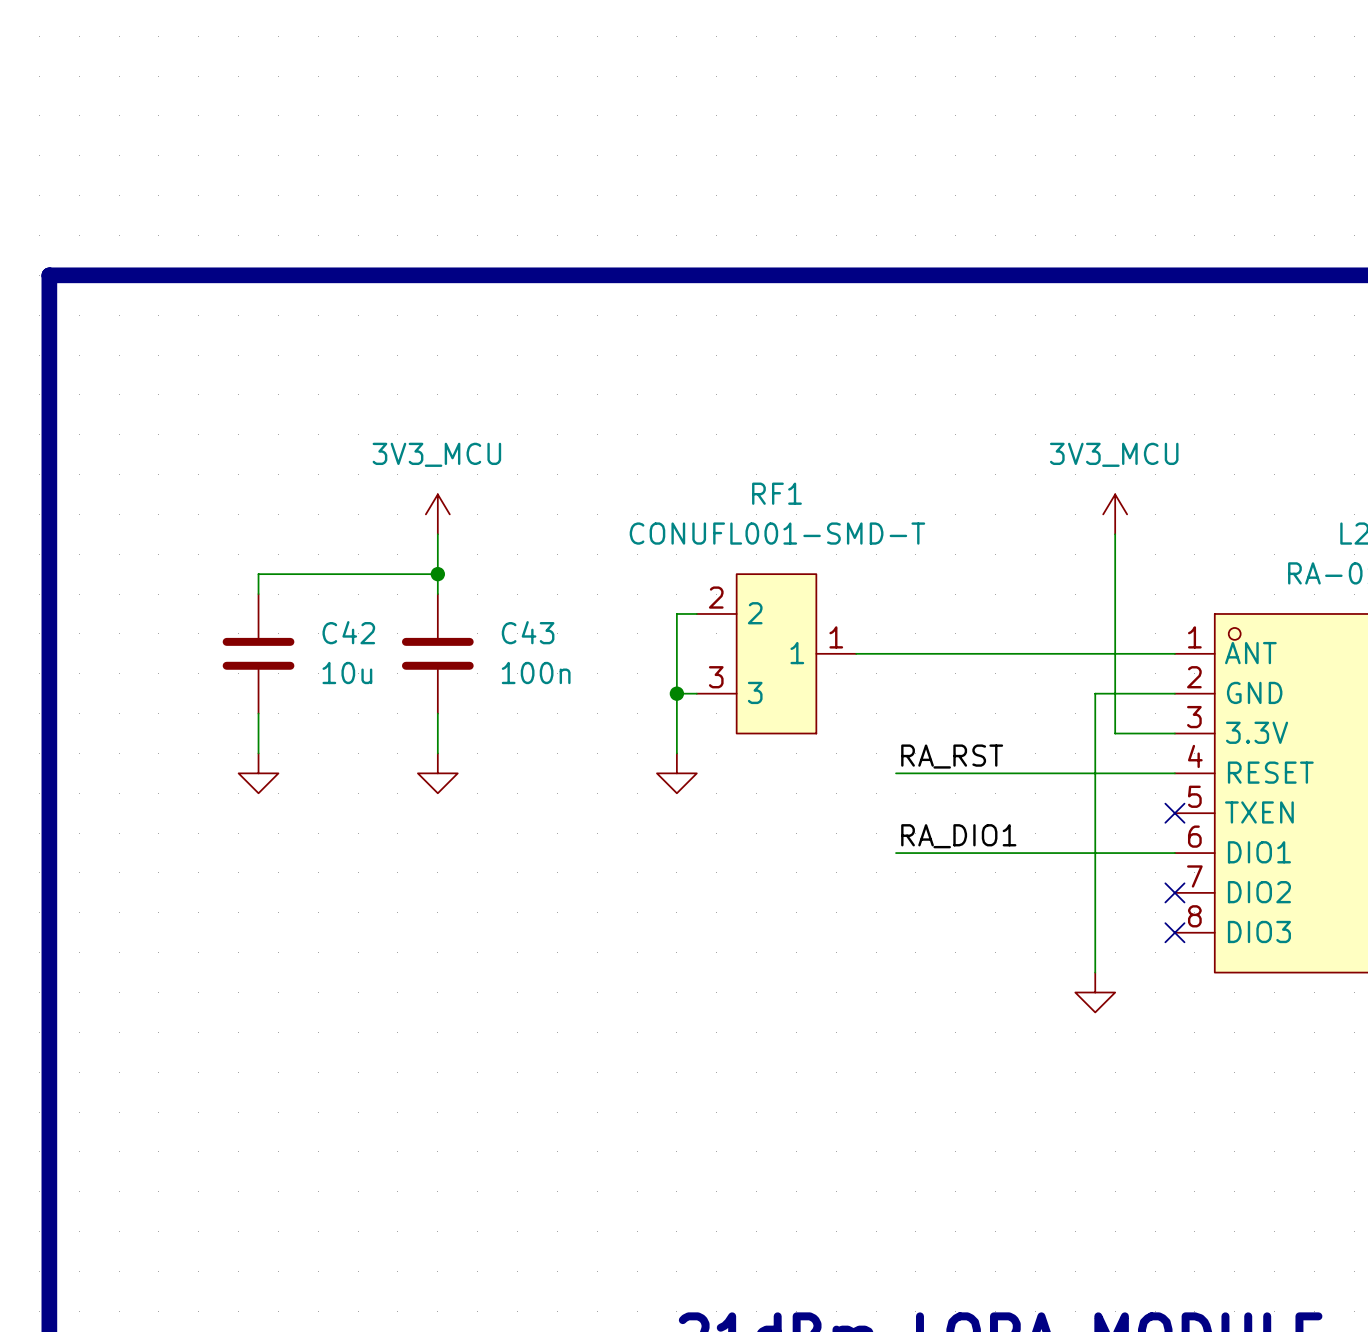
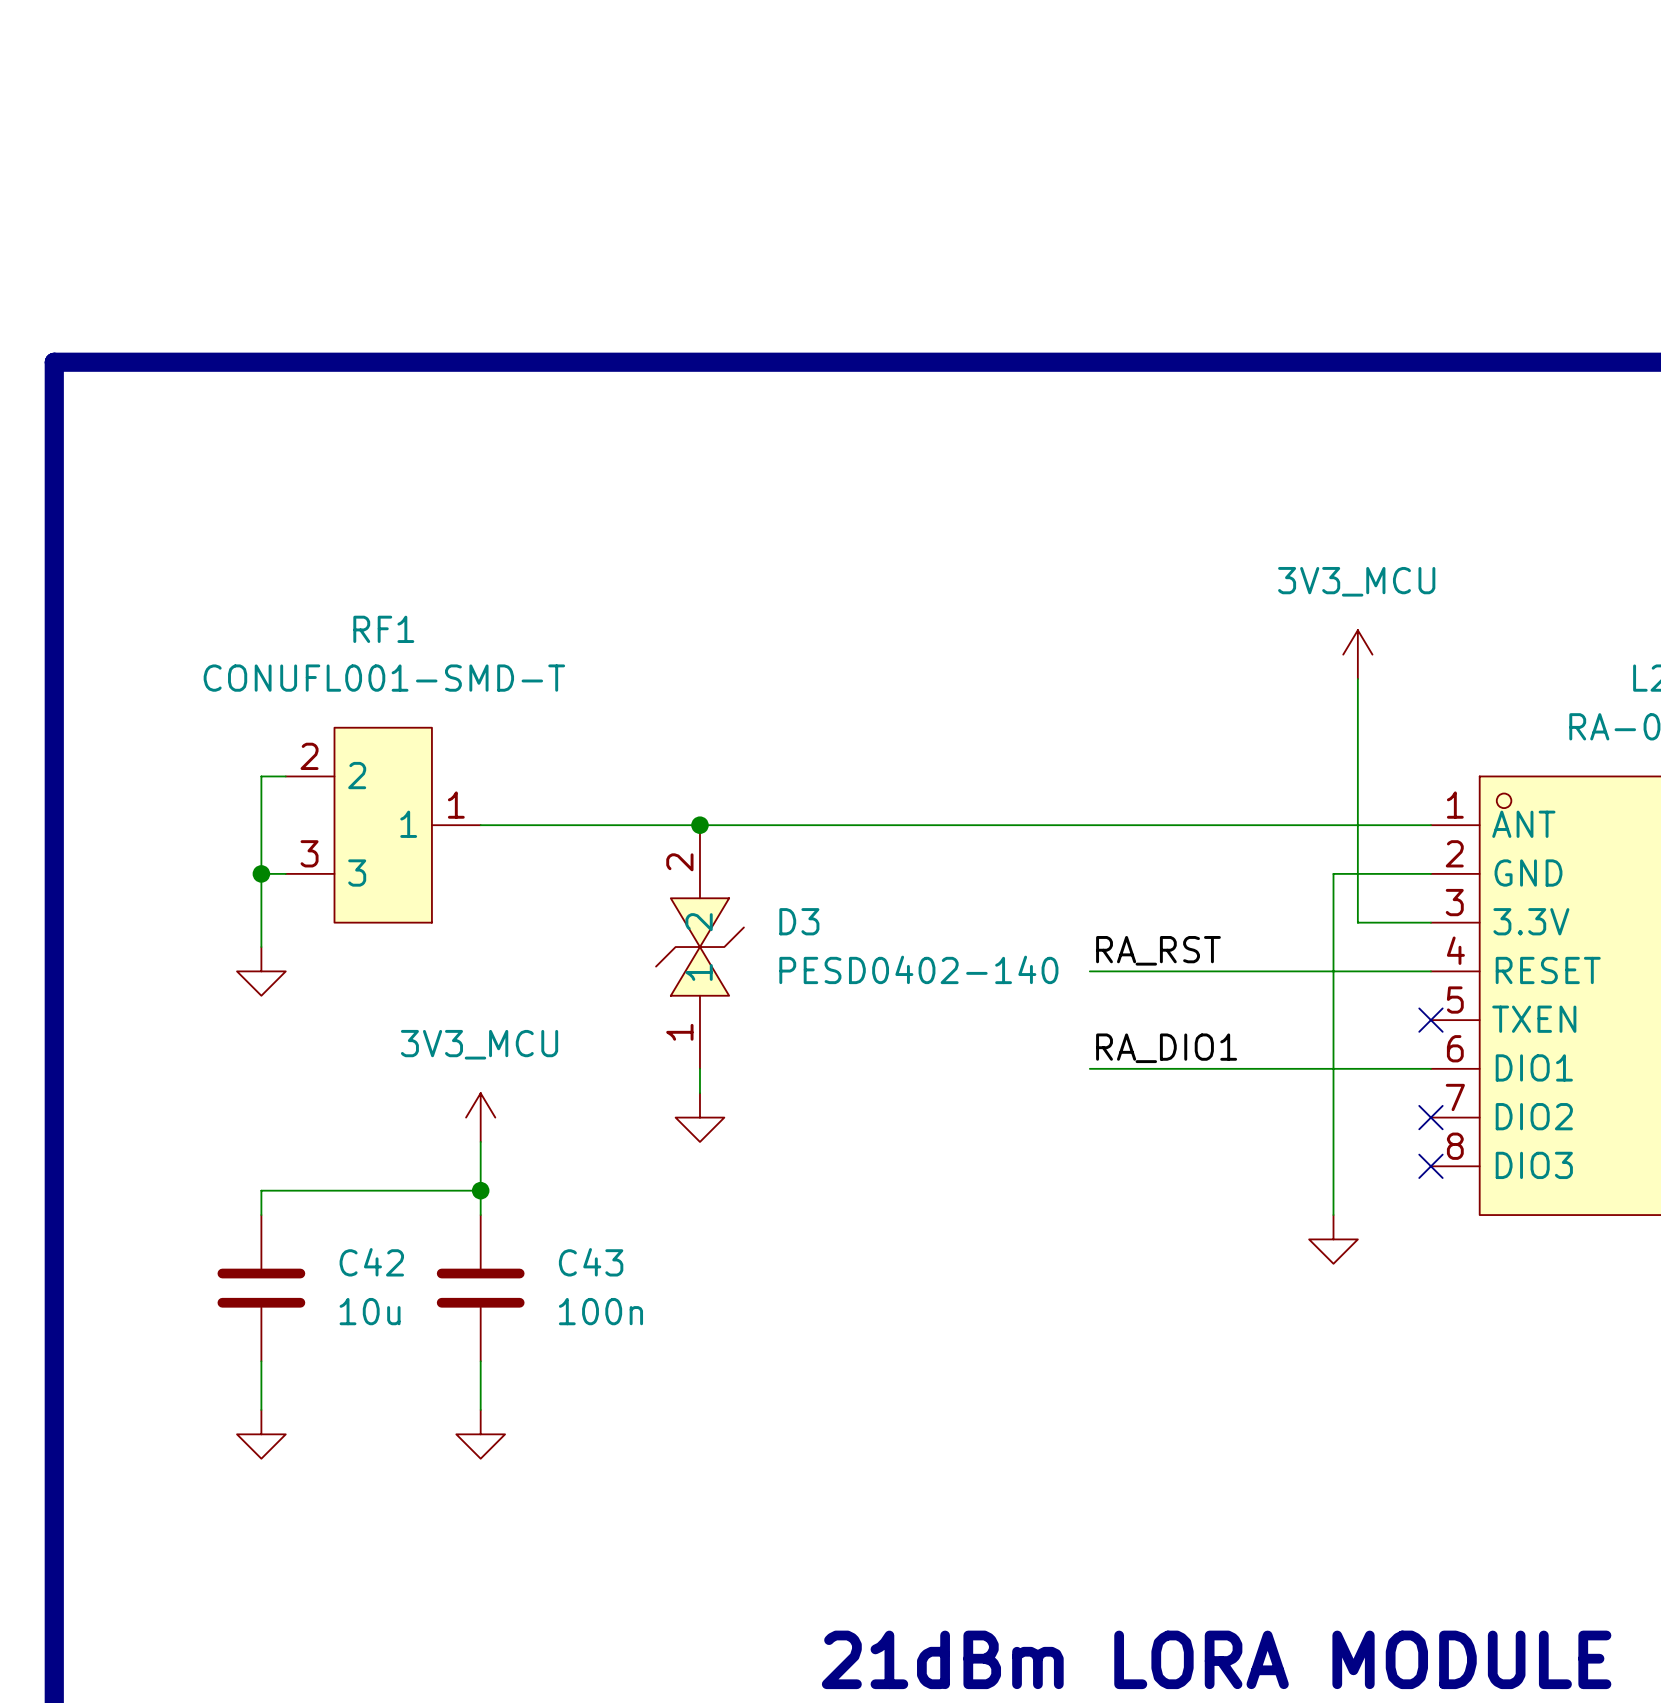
power symbol position: 3V3_MCU (437, 514) -> 3V3_MCU (480, 1117)
wire: (437, 534) (437, 594) -> (480, 1141) (480, 1215)
wire: (437, 574) (258, 574) (258, 594) -> (480, 1190) (261, 1190) (261, 1215)
junction: (437, 574) -> none
wire: none -> (285, 776) (261, 776) (261, 947)
wire: (696, 613) (676, 613) (676, 753) -> none
C42 position: (258, 653) -> (261, 1288)
wire: none -> (480, 825) (1041, 825)
C43 position: (437, 653) -> (480, 1288)
junction: none -> (699, 825)
RF1 position: (776, 653) -> (383, 825)
wire: none -> (261, 873) (285, 873)
junction: none -> (261, 873)
wire: (676, 693) (696, 693) -> none
junction: (676, 693) -> none
wire: (258, 713) (258, 753) -> (261, 1361) (261, 1409)
wire: (437, 713) (437, 753) -> (480, 1361) (480, 1409)
D3: none -> PESD0402-140 (699, 947)
power symbol position: (258, 773) -> (261, 971)
power symbol: (437, 773) -> none
power symbol: (676, 773) -> none
wire: none -> (699, 1068) (699, 1093)
power symbol: none -> (699, 1117)
junction: none -> (480, 1190)
power symbol: none -> (261, 1434)
power symbol: none -> (480, 1434)

